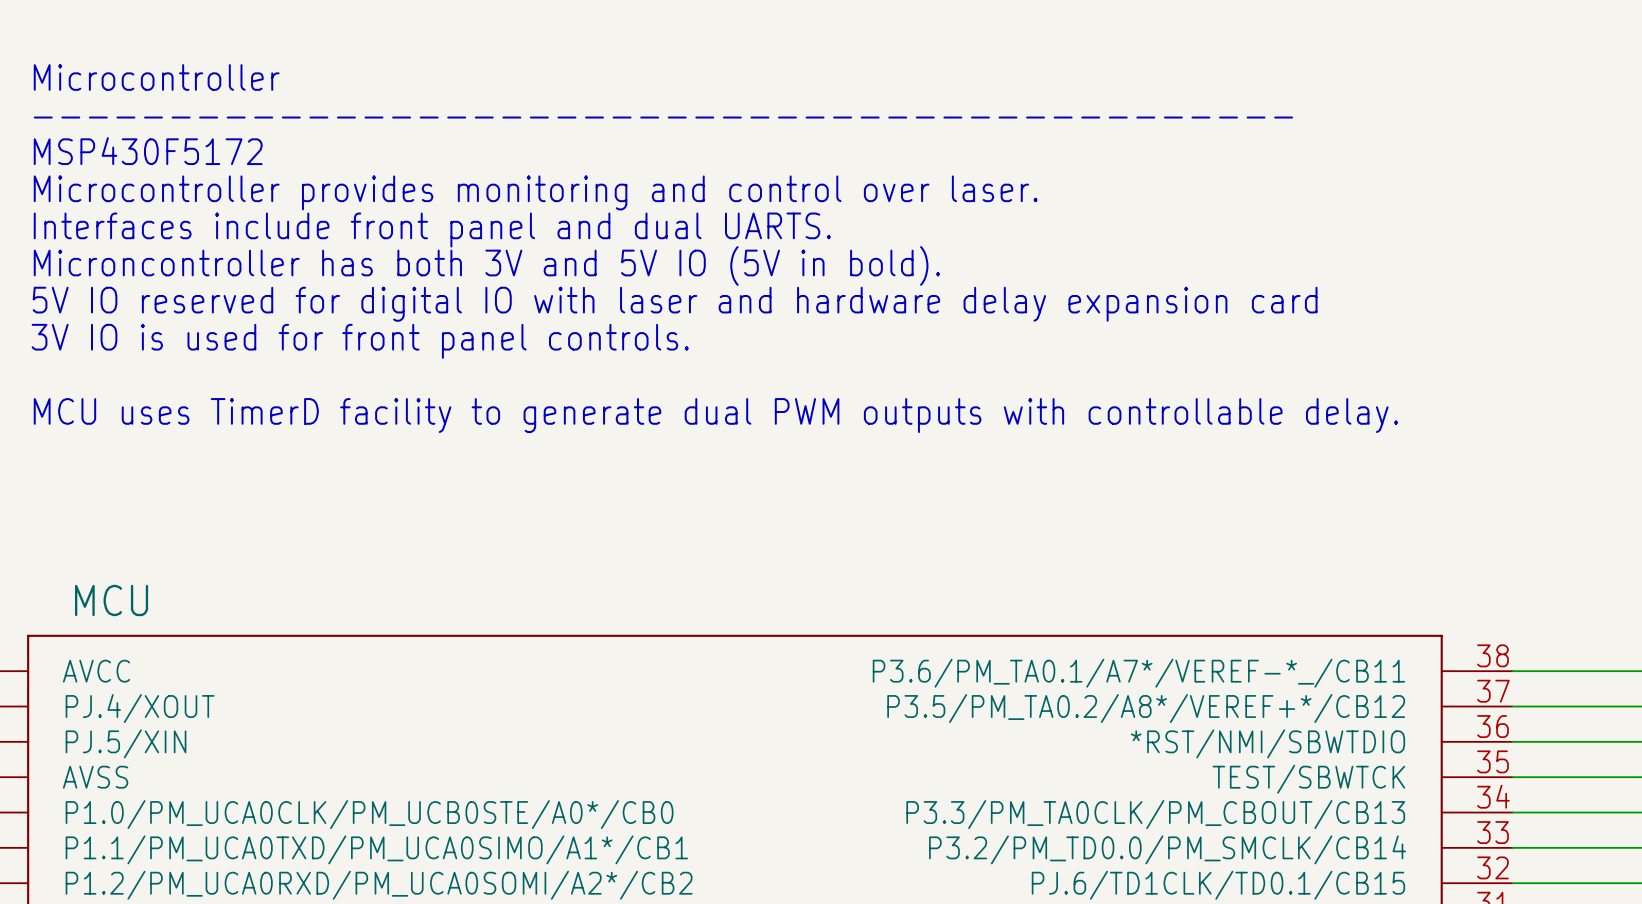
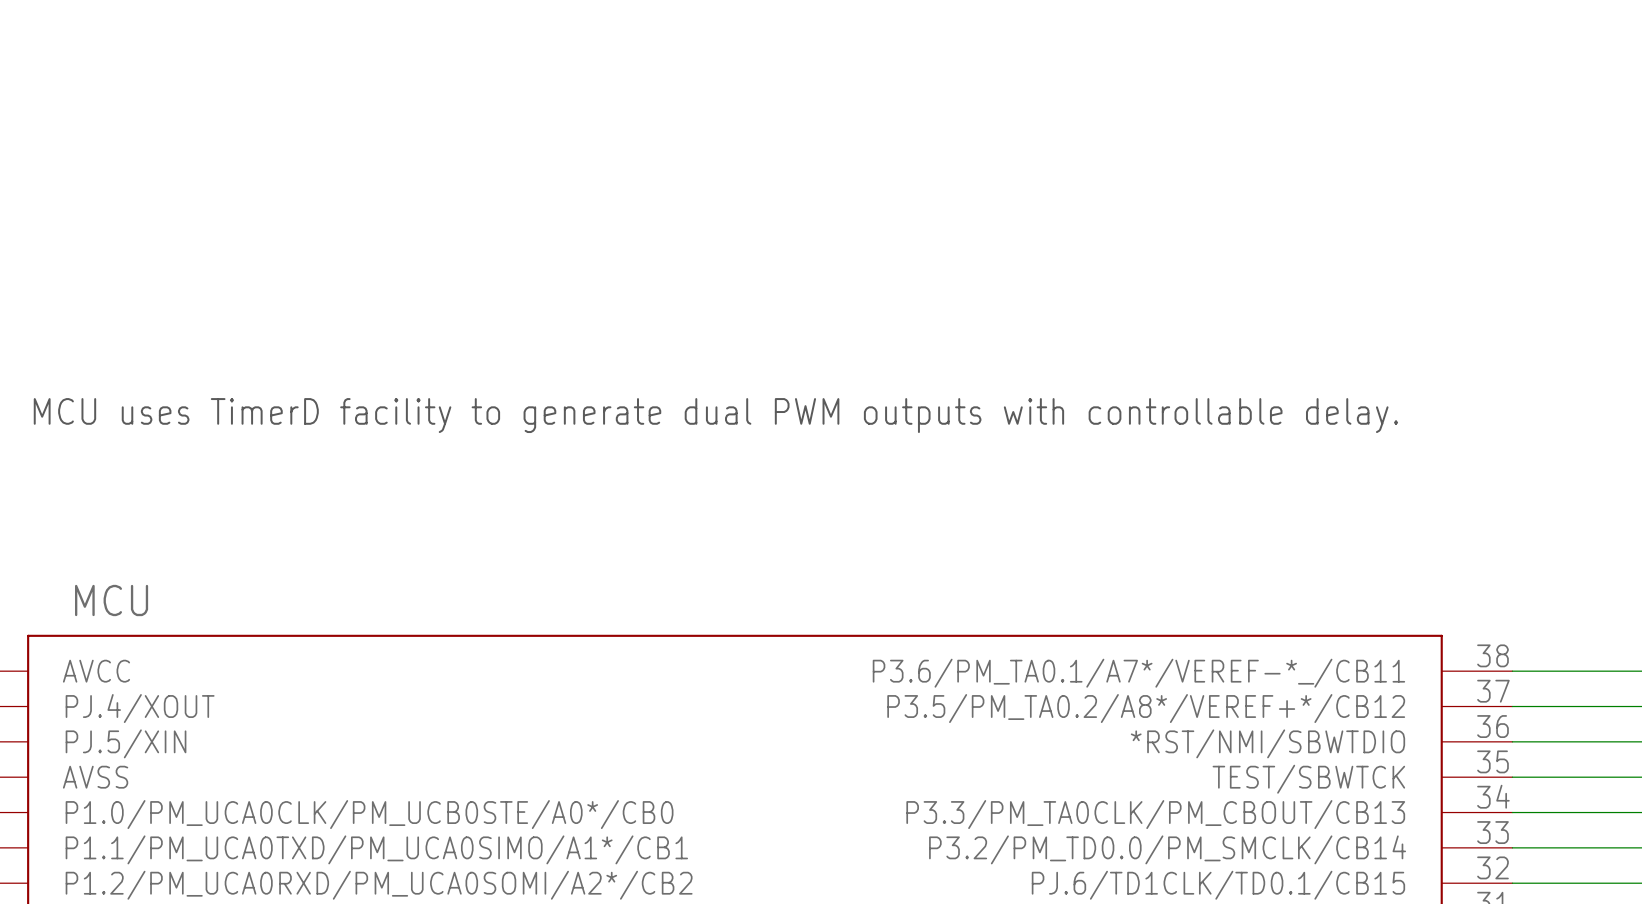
text: Microcontroller (156, 77) -> none
text: ---------------------------------------------- (663, 117) -> none
text: MSP430F5172 (148, 151) -> none
text: Microcontroller provides monitoring and control over laser. (535, 192) -> none
text: Interfaces include front panel and dual UARTS. (432, 230) -> none
text: Microncontroller has both 3V and 5V IO (5V in bold). (486, 265) -> none
text: 5V IO reserved for digital IO with laser and hardware delay expansion card (675, 304) -> none
text: 3V IO is used for front panel controls. (360, 341) -> none

